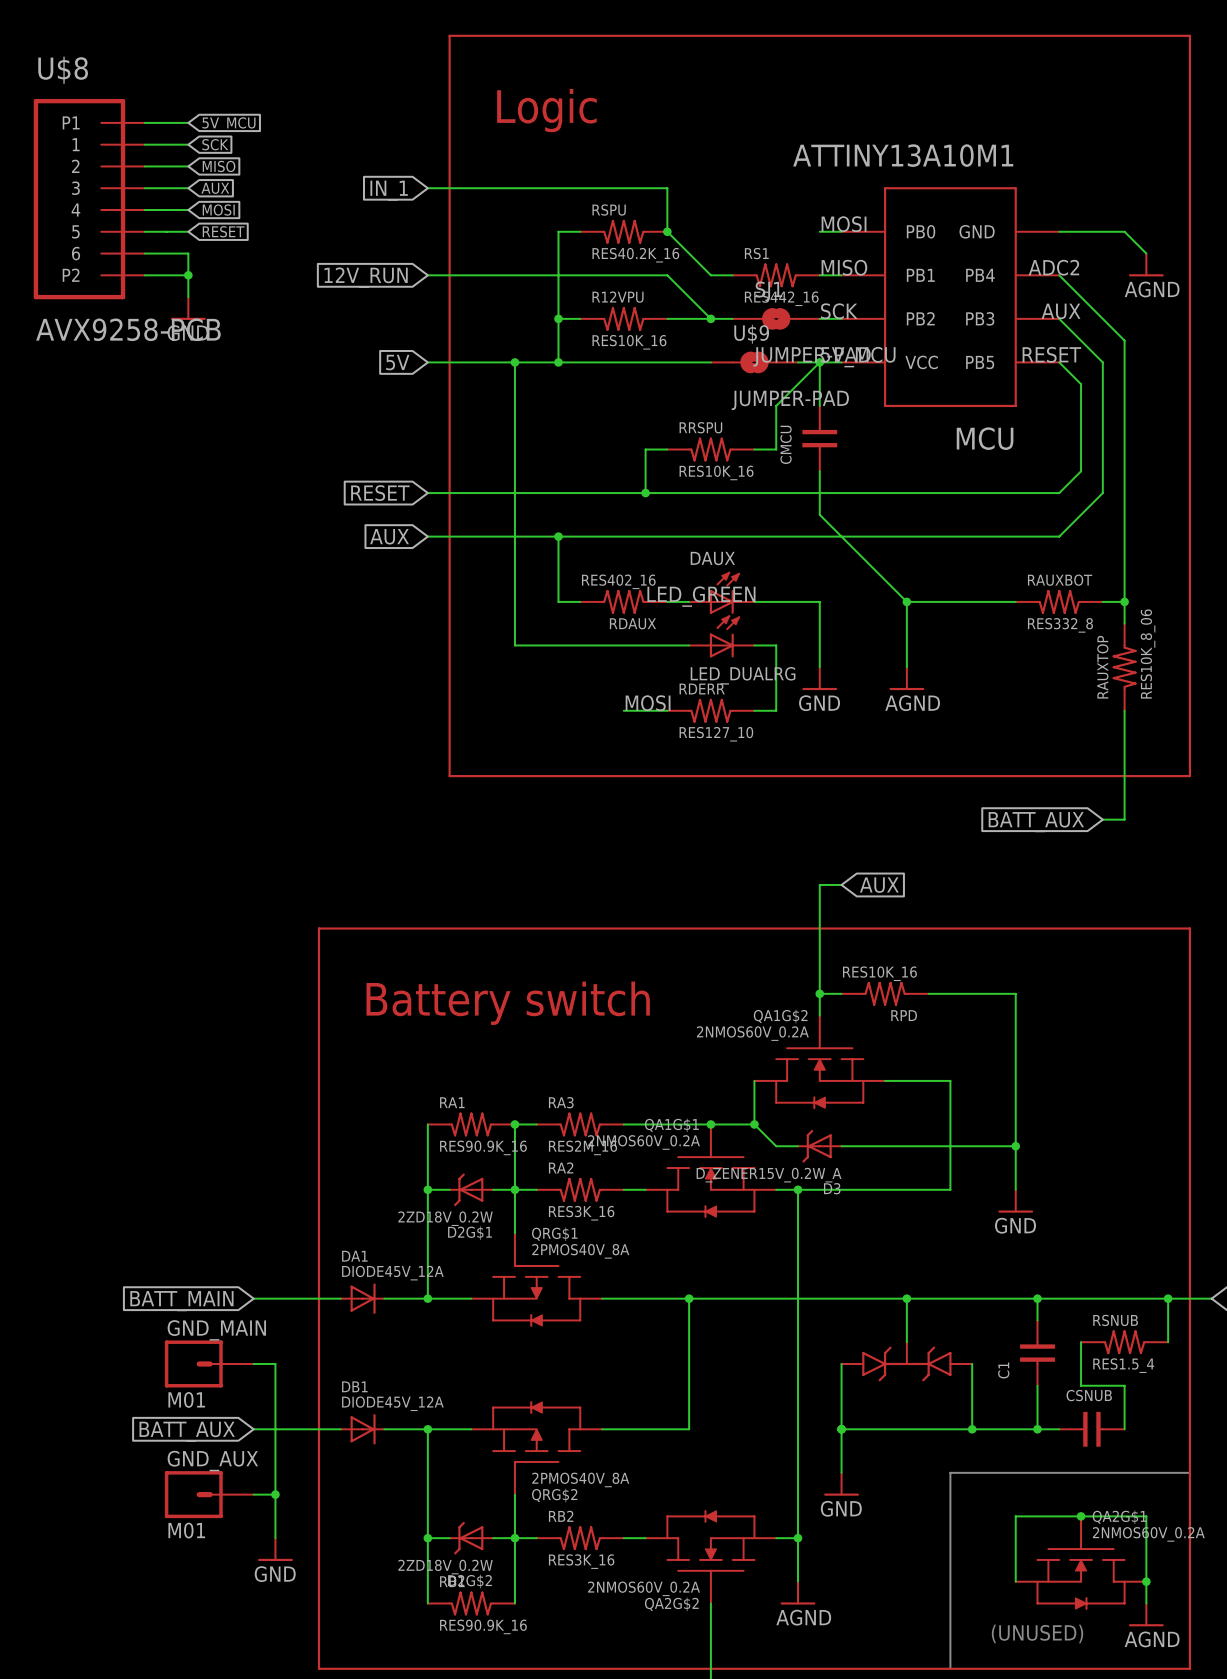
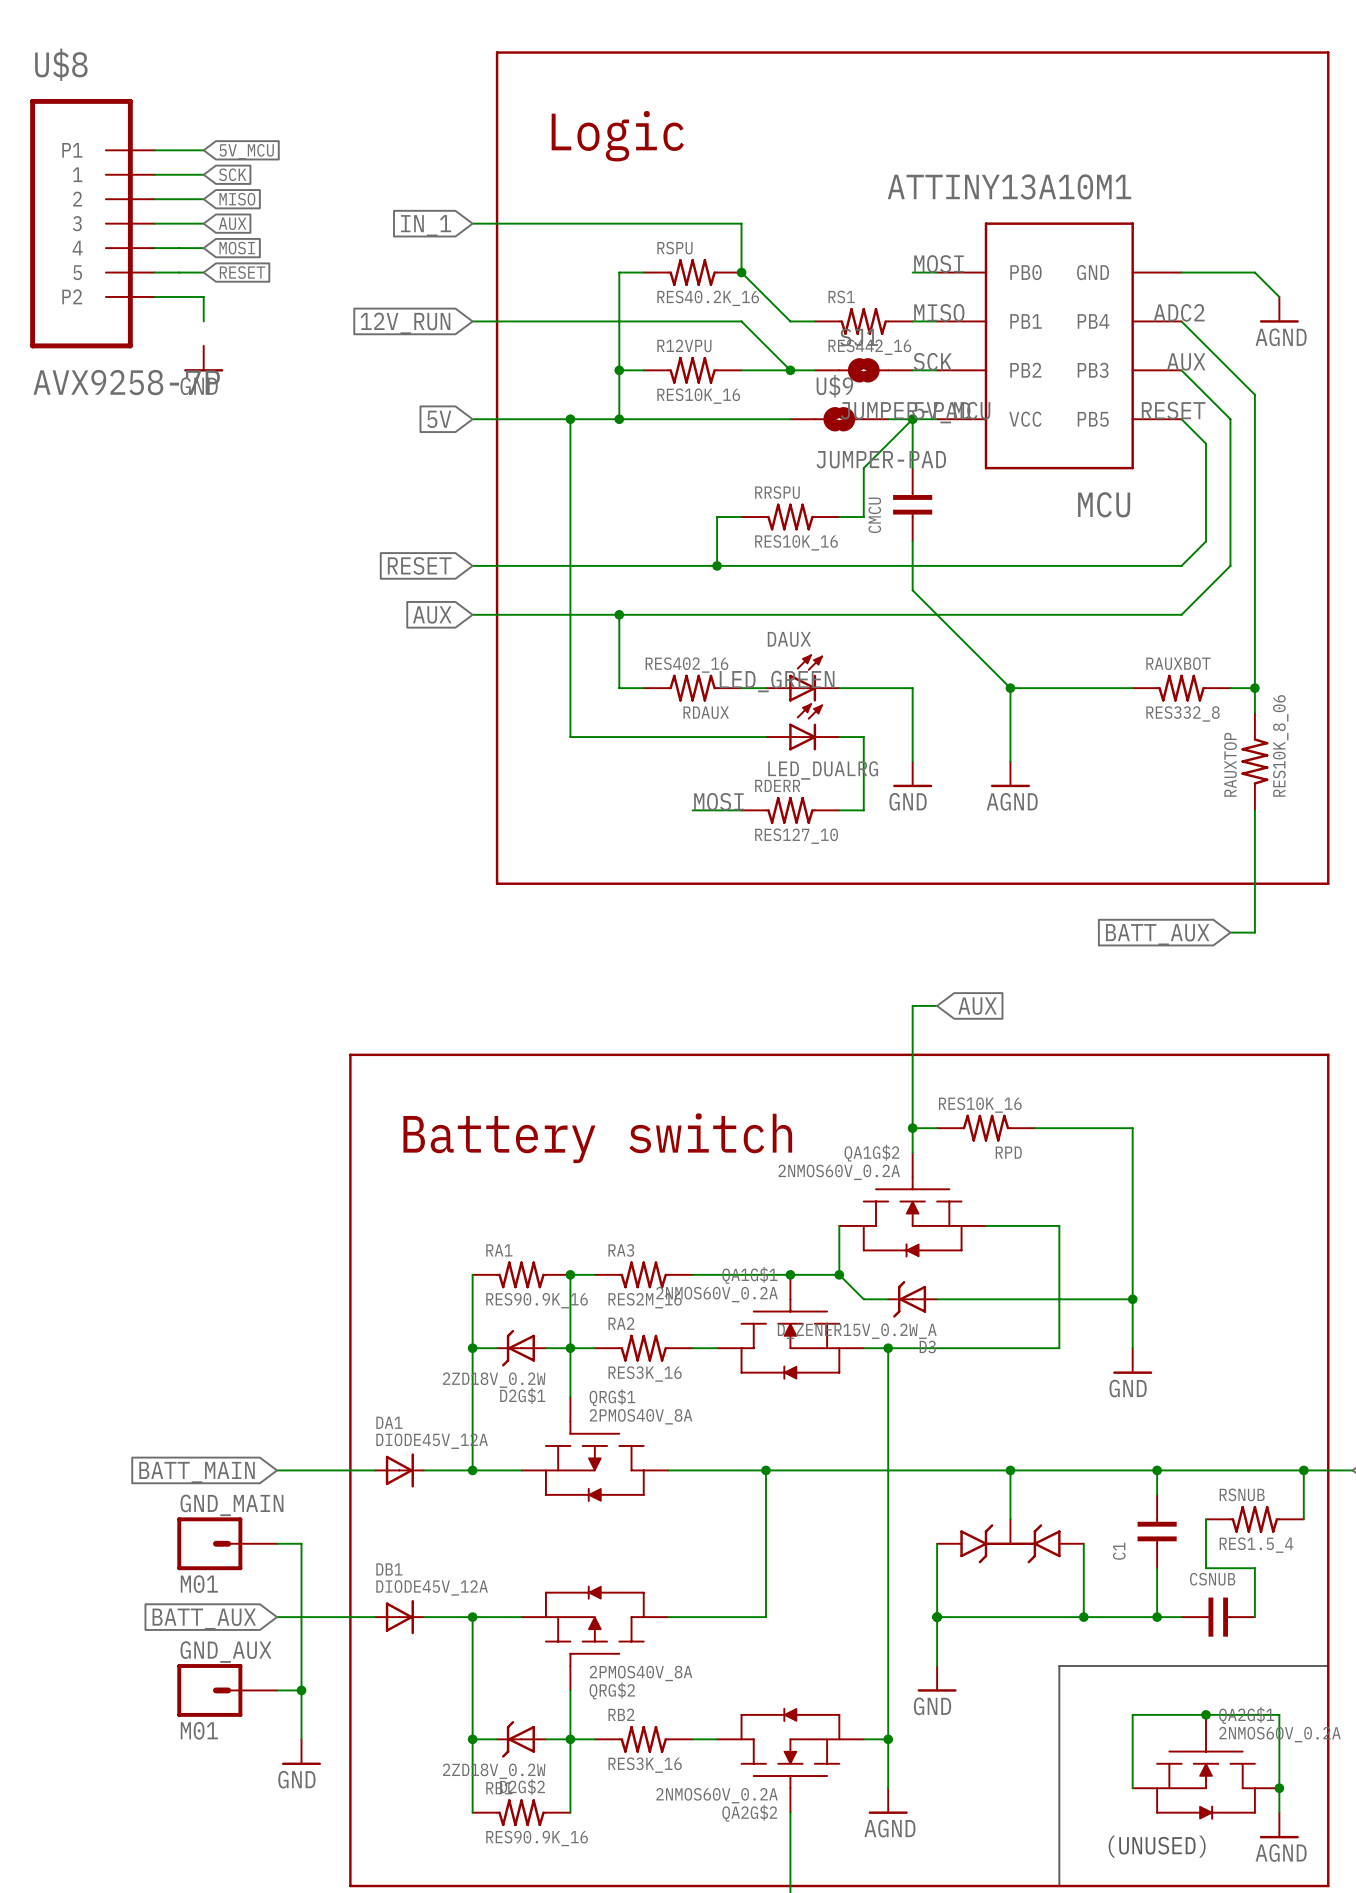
U$8 symbol: [33, 98, 145, 300] -> [30, 98, 155, 349]
wire: (144, 275) (188, 275) (188, 297) -> none
junction: (188, 275) -> none
U$8 value: AVX9258-PCB (128, 329) -> AVX9258-7P (126, 382)

